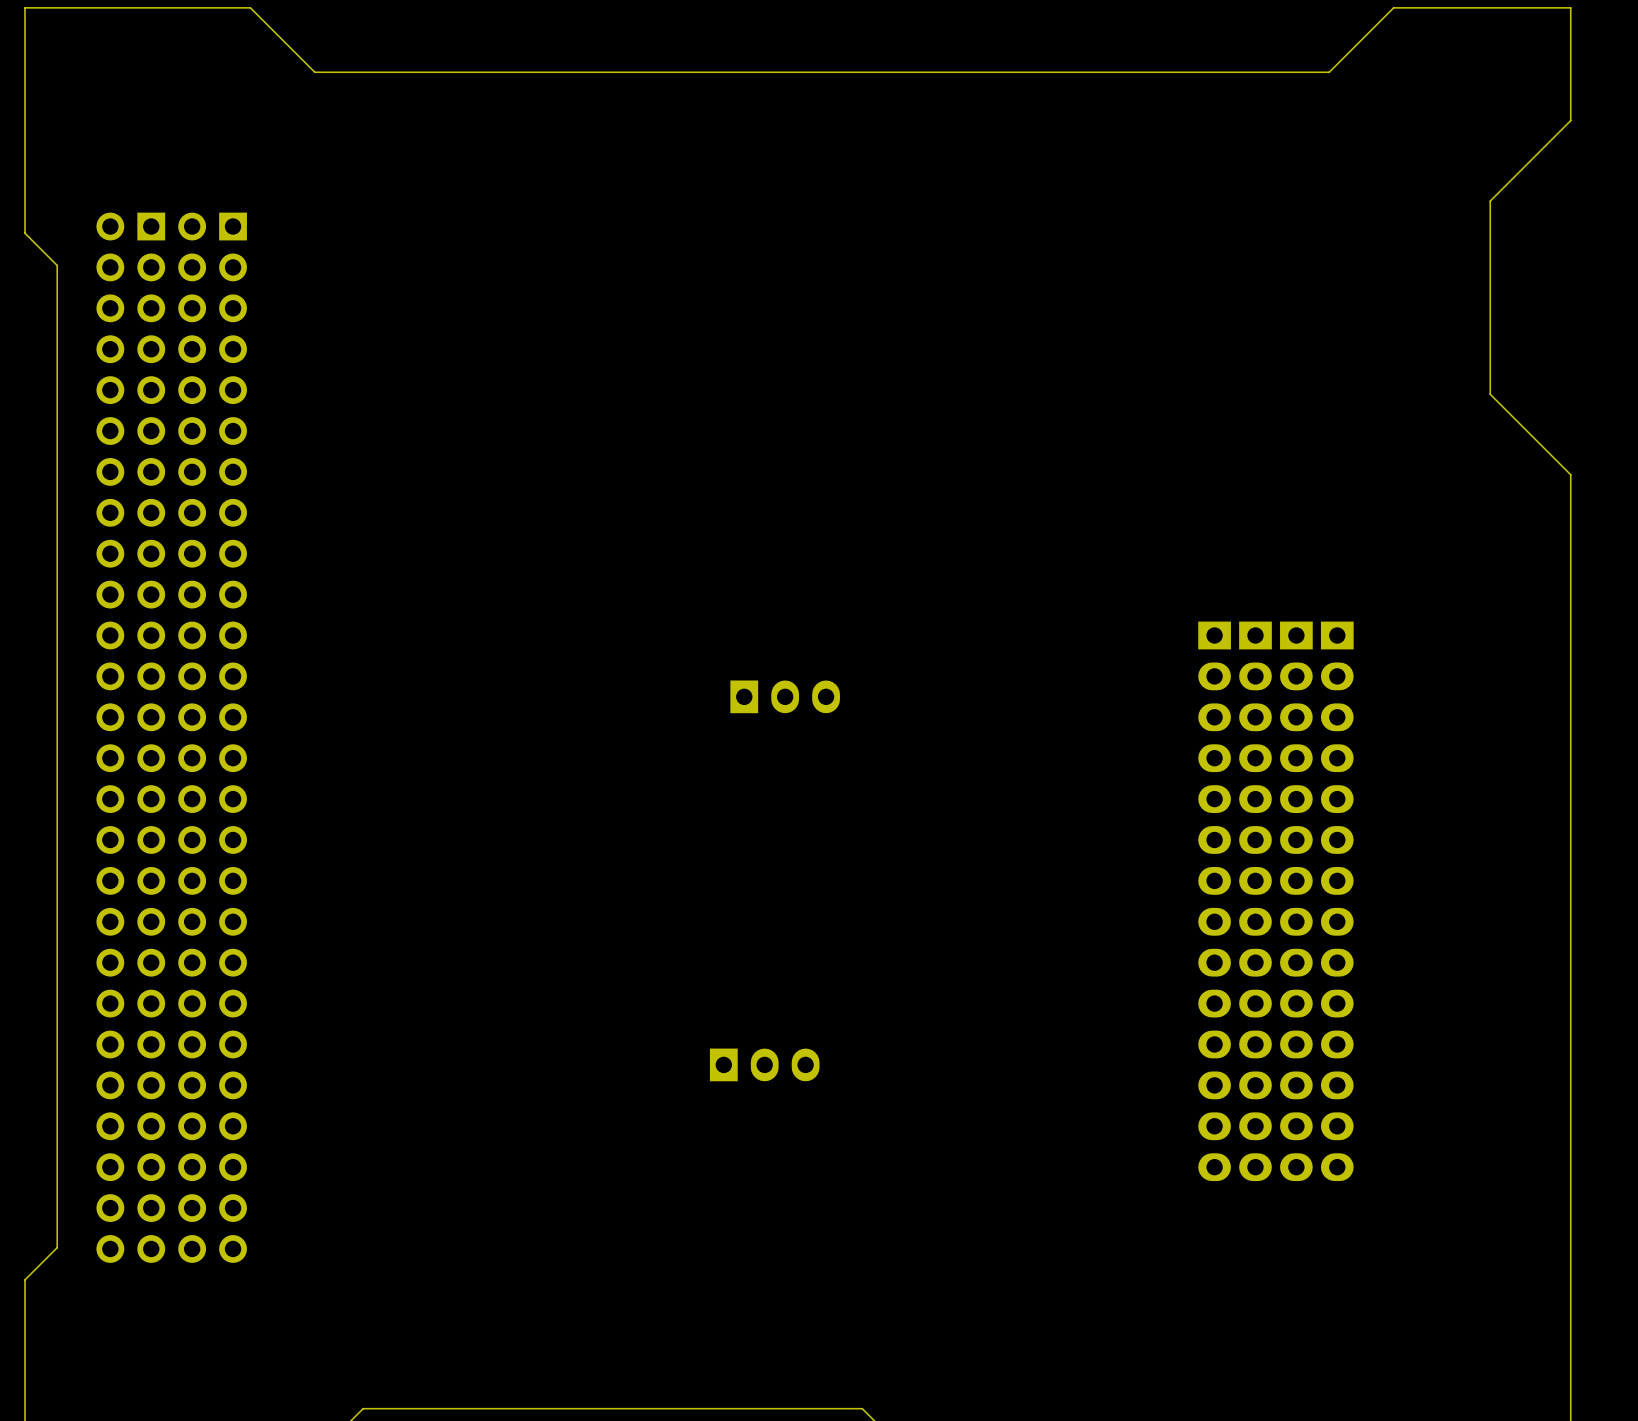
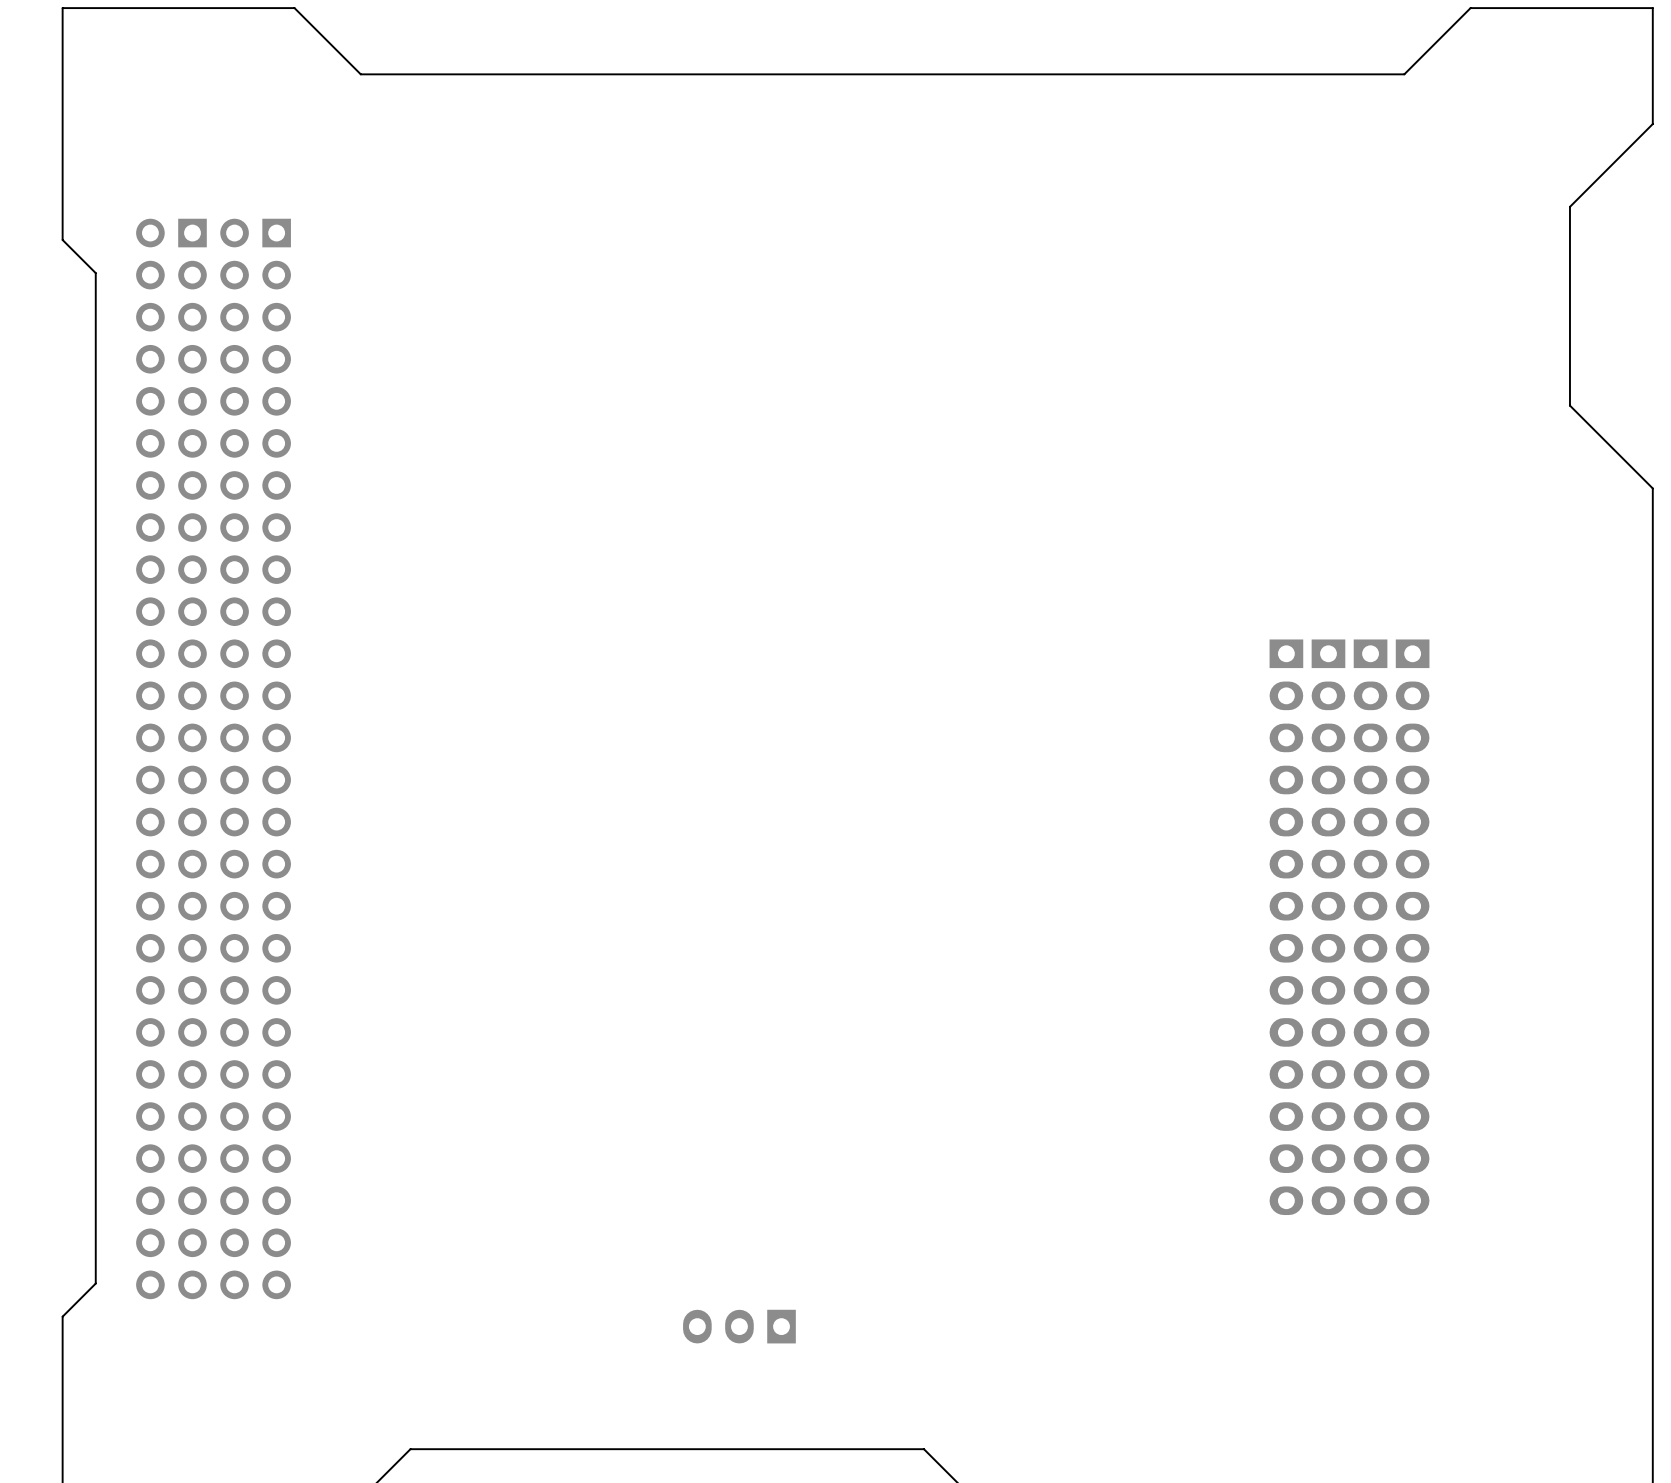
part: (785, 696) -> none
part rotation: 0° (764, 1064) -> 180° (739, 1326)
part position: (764, 1064) -> (739, 1326)

